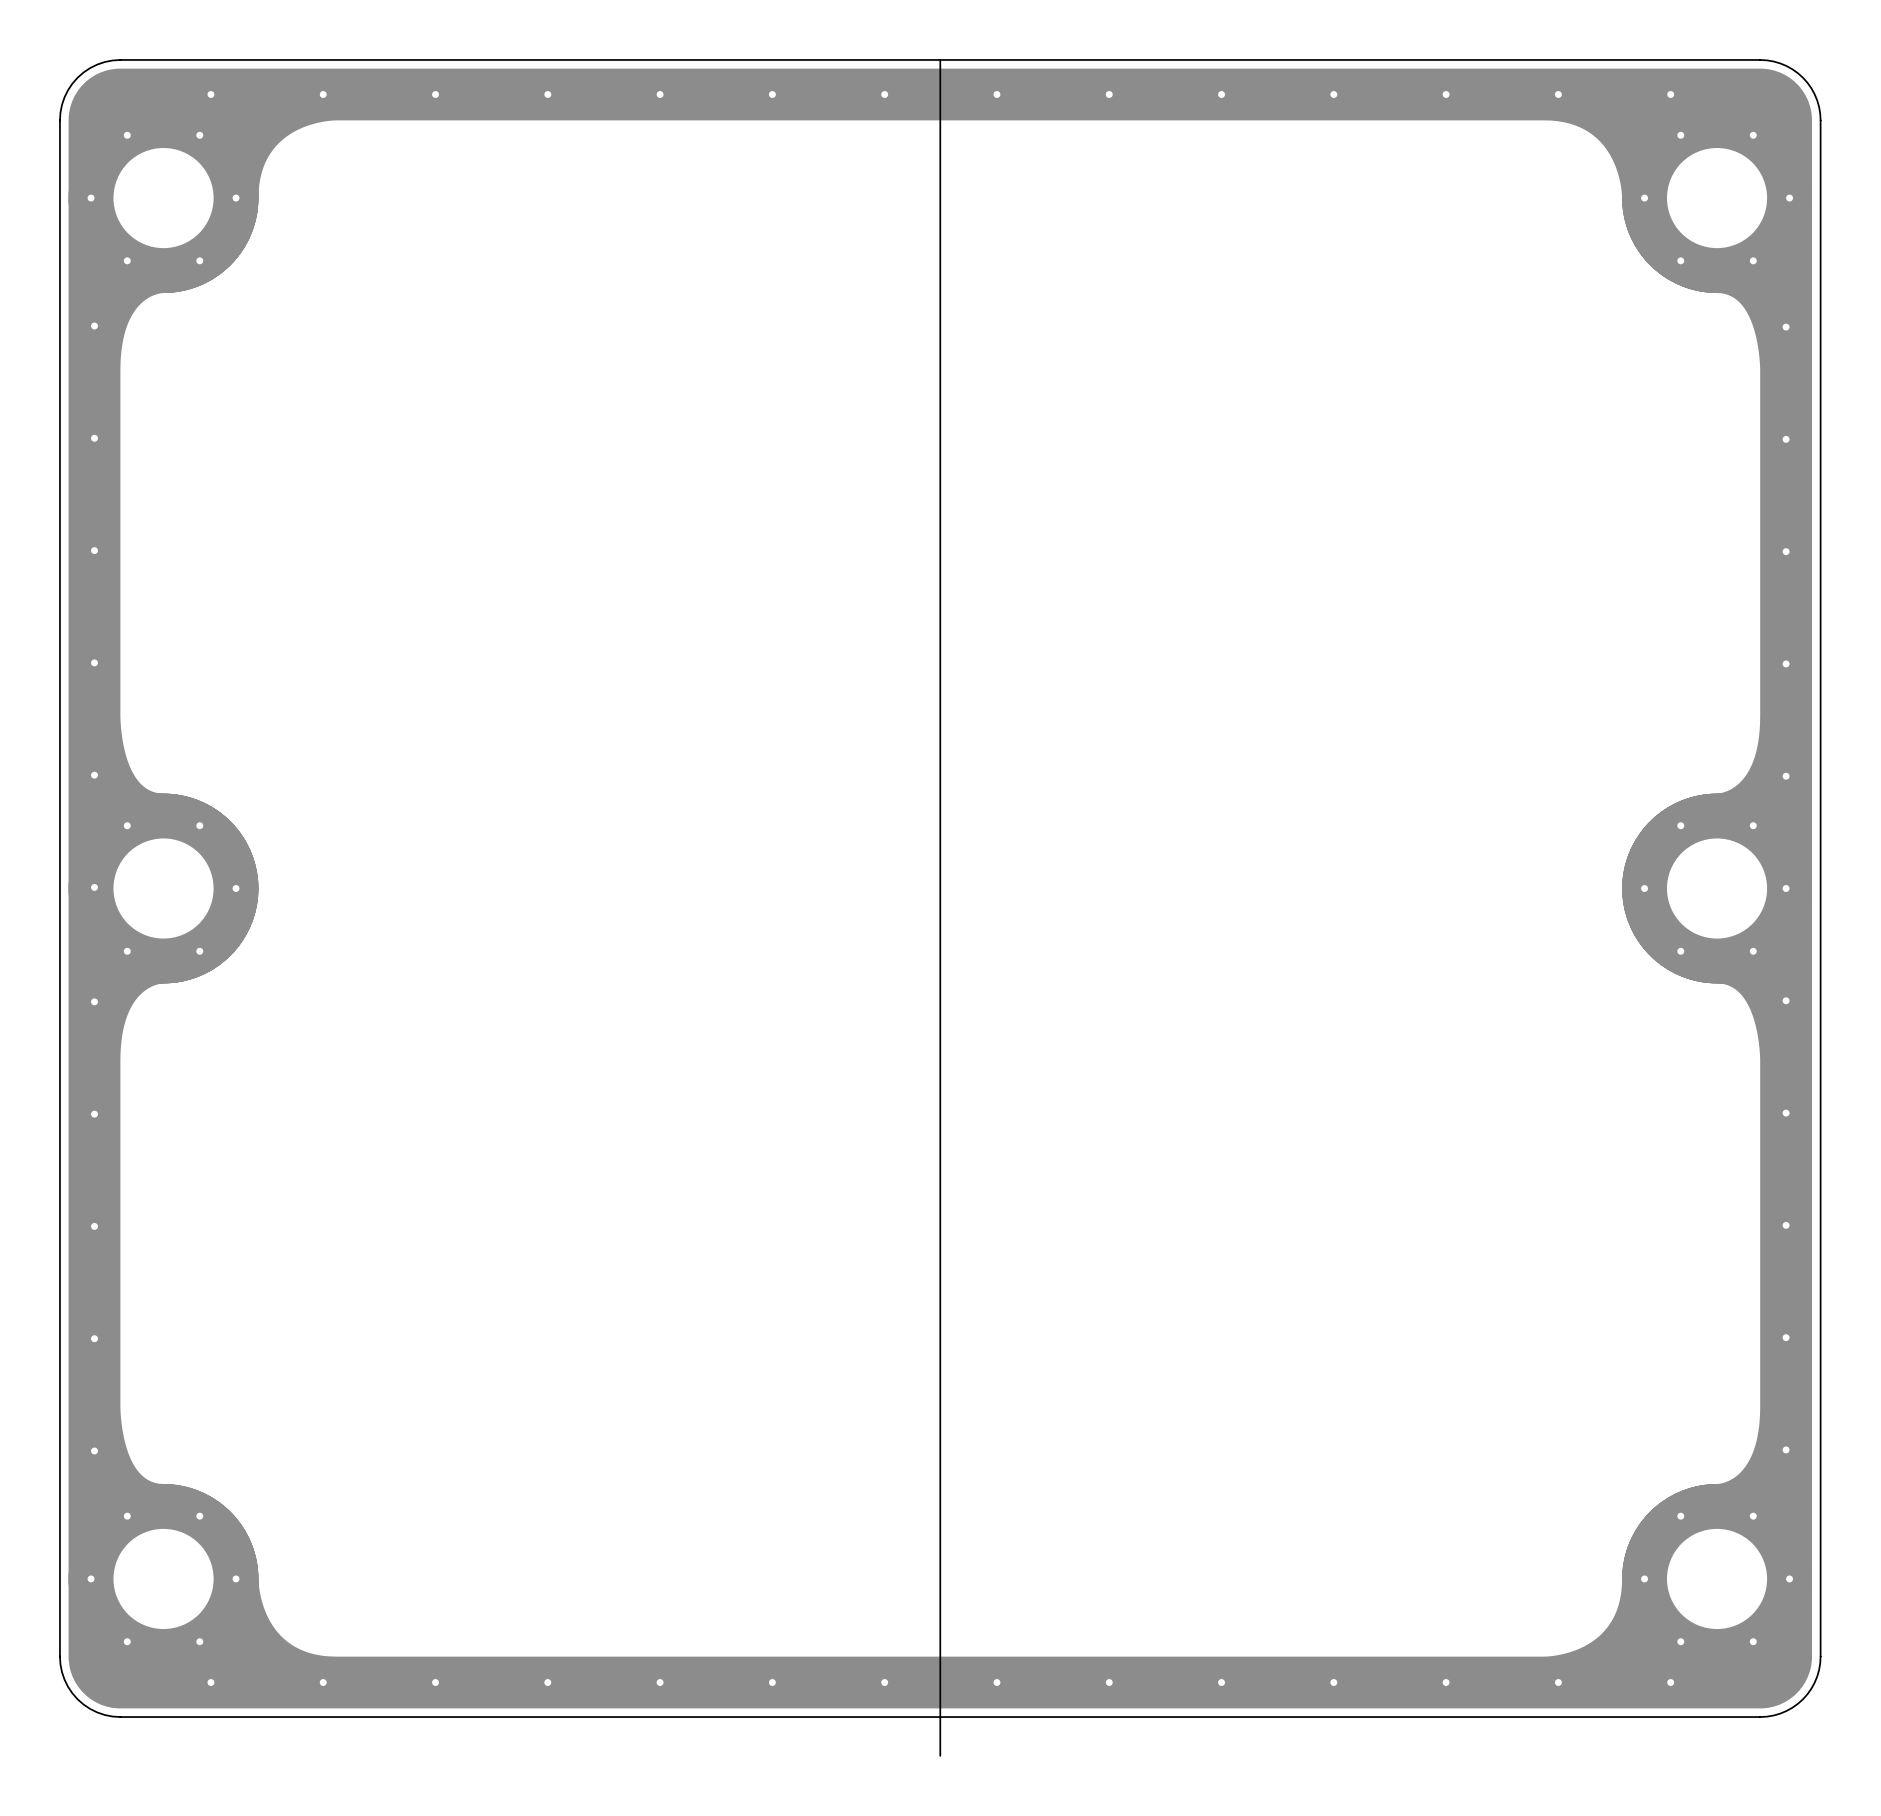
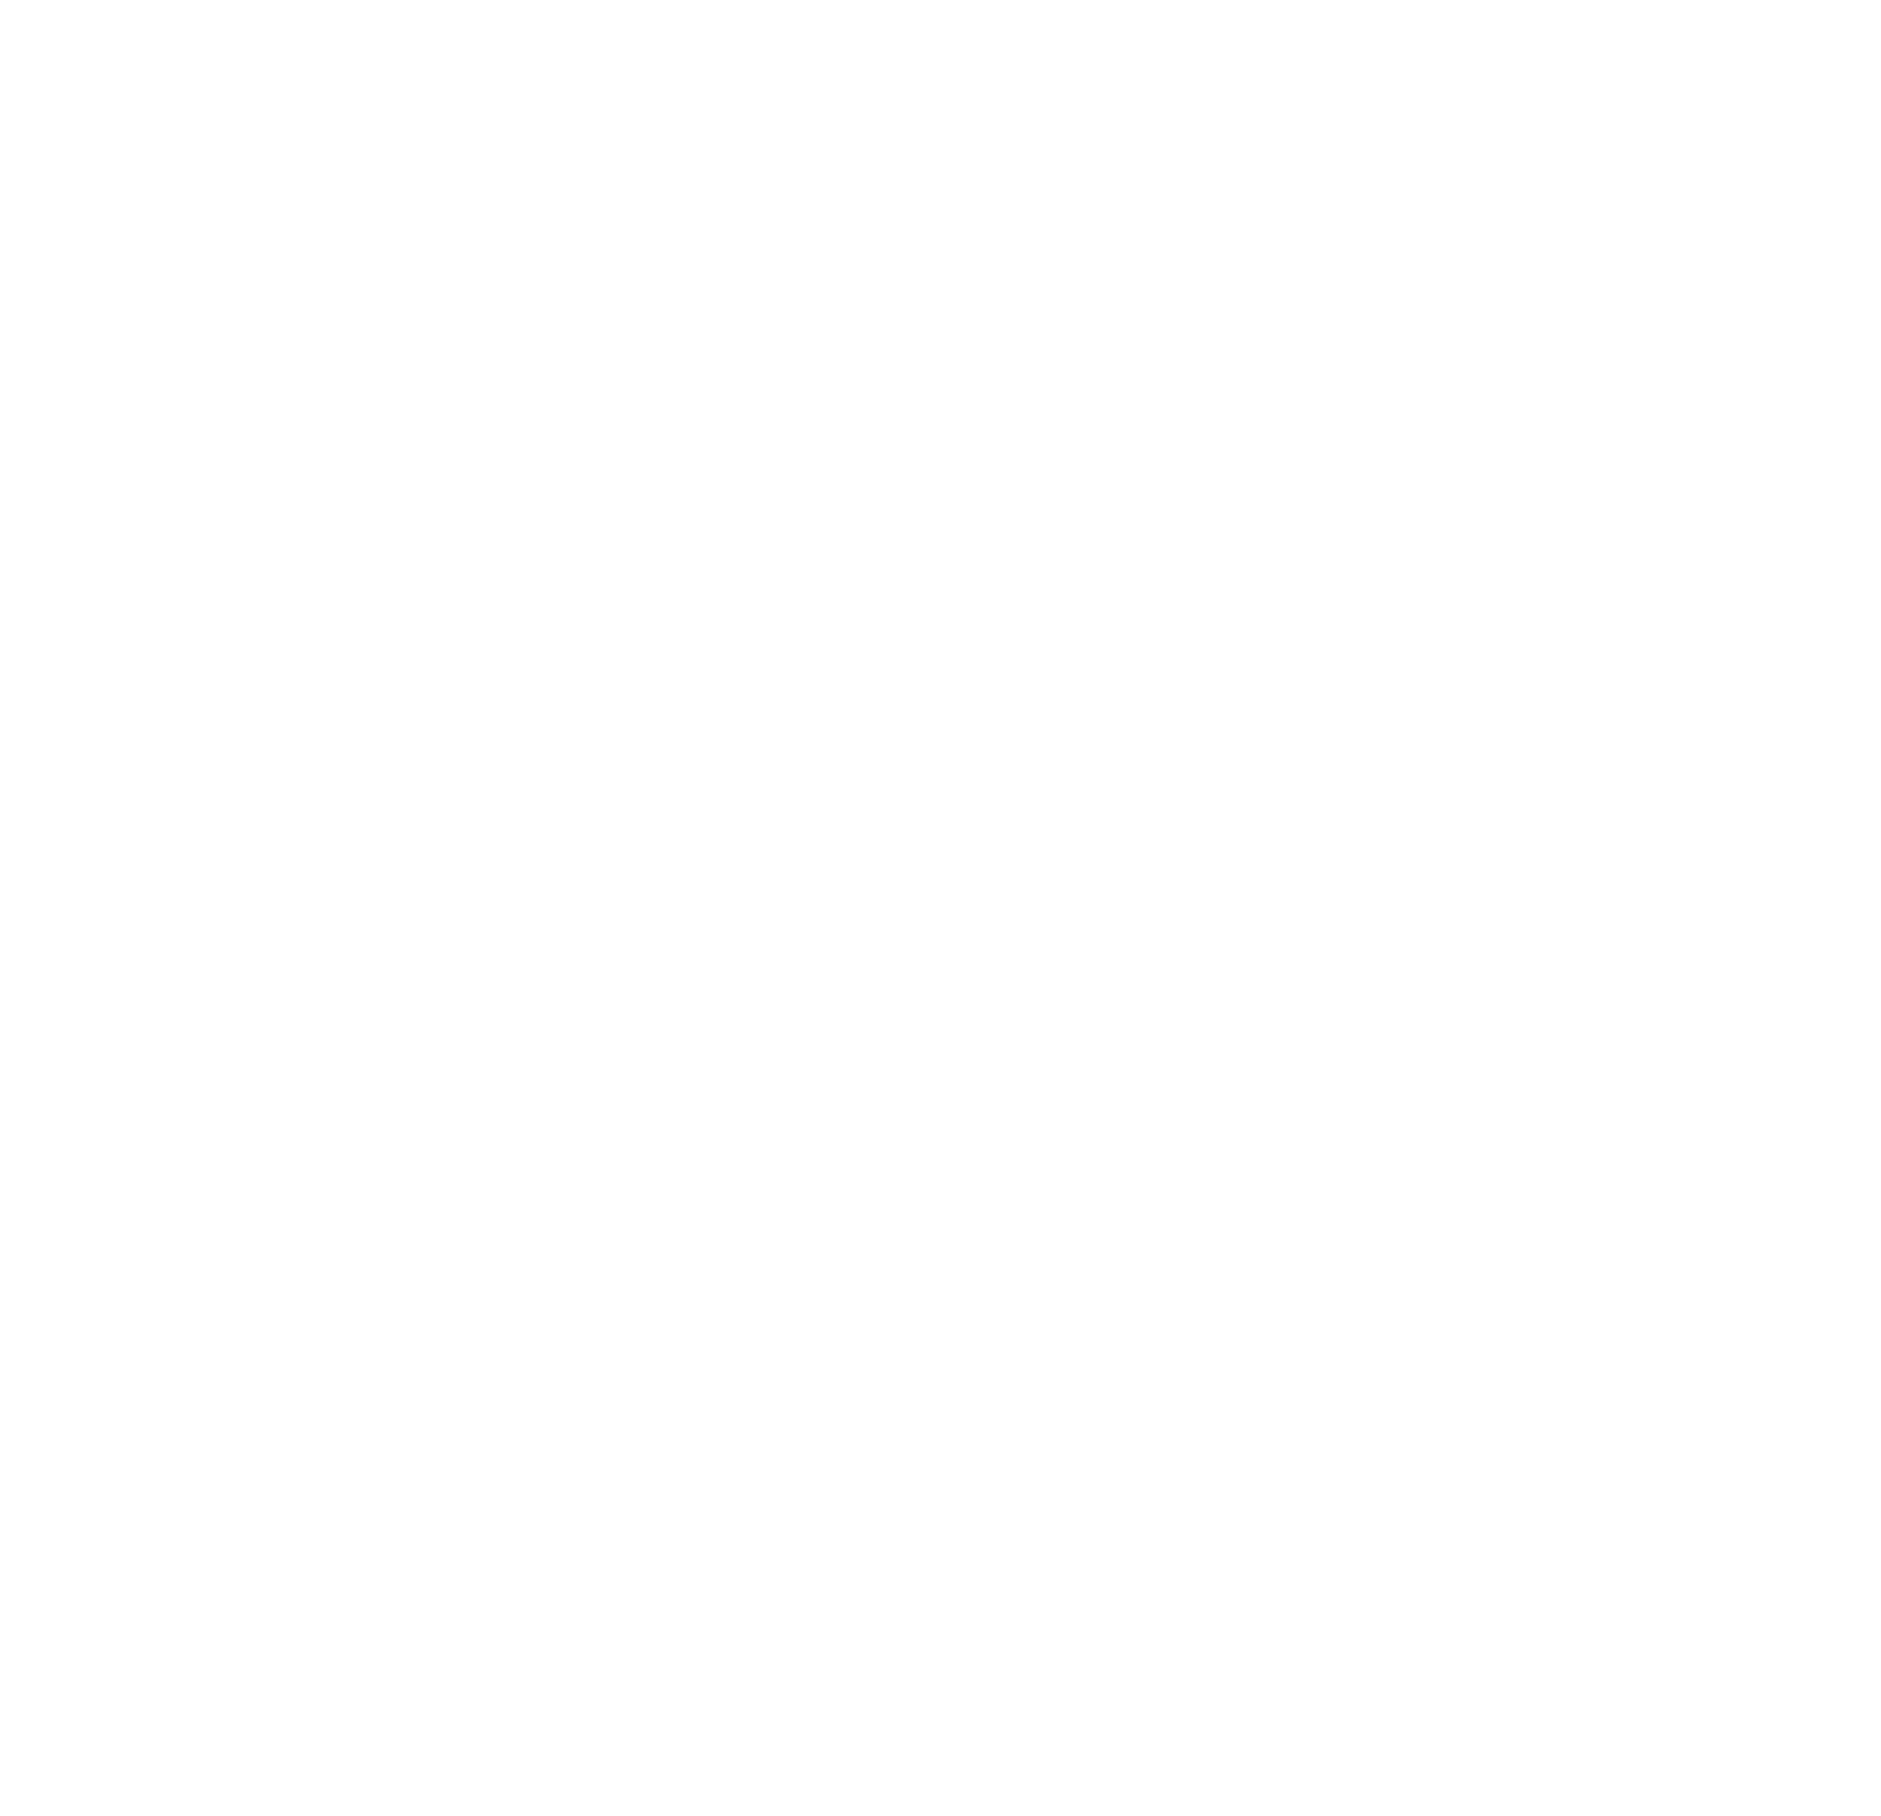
part: (940, 907) -> none

